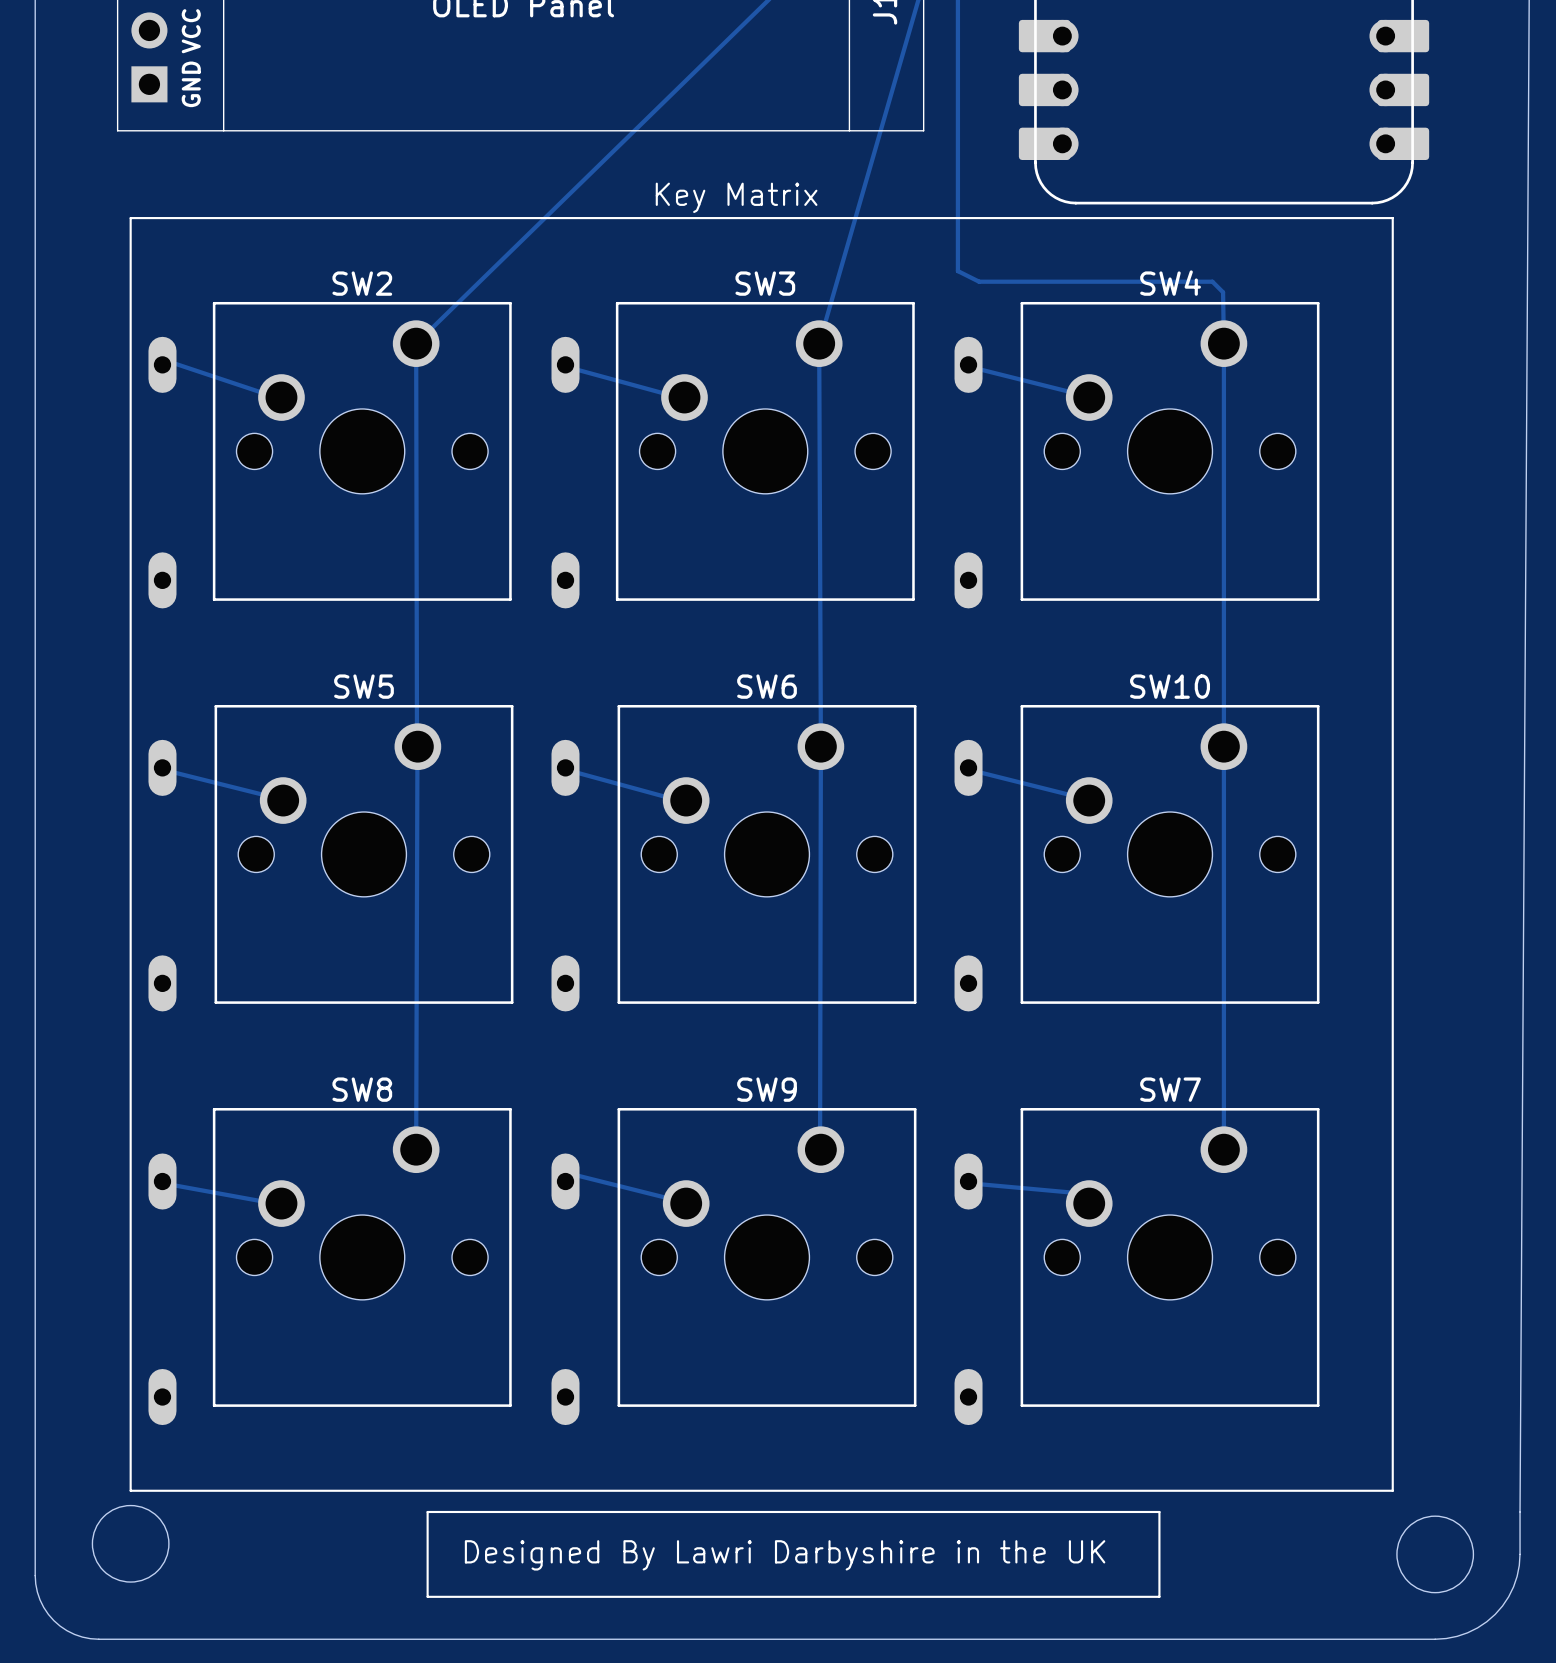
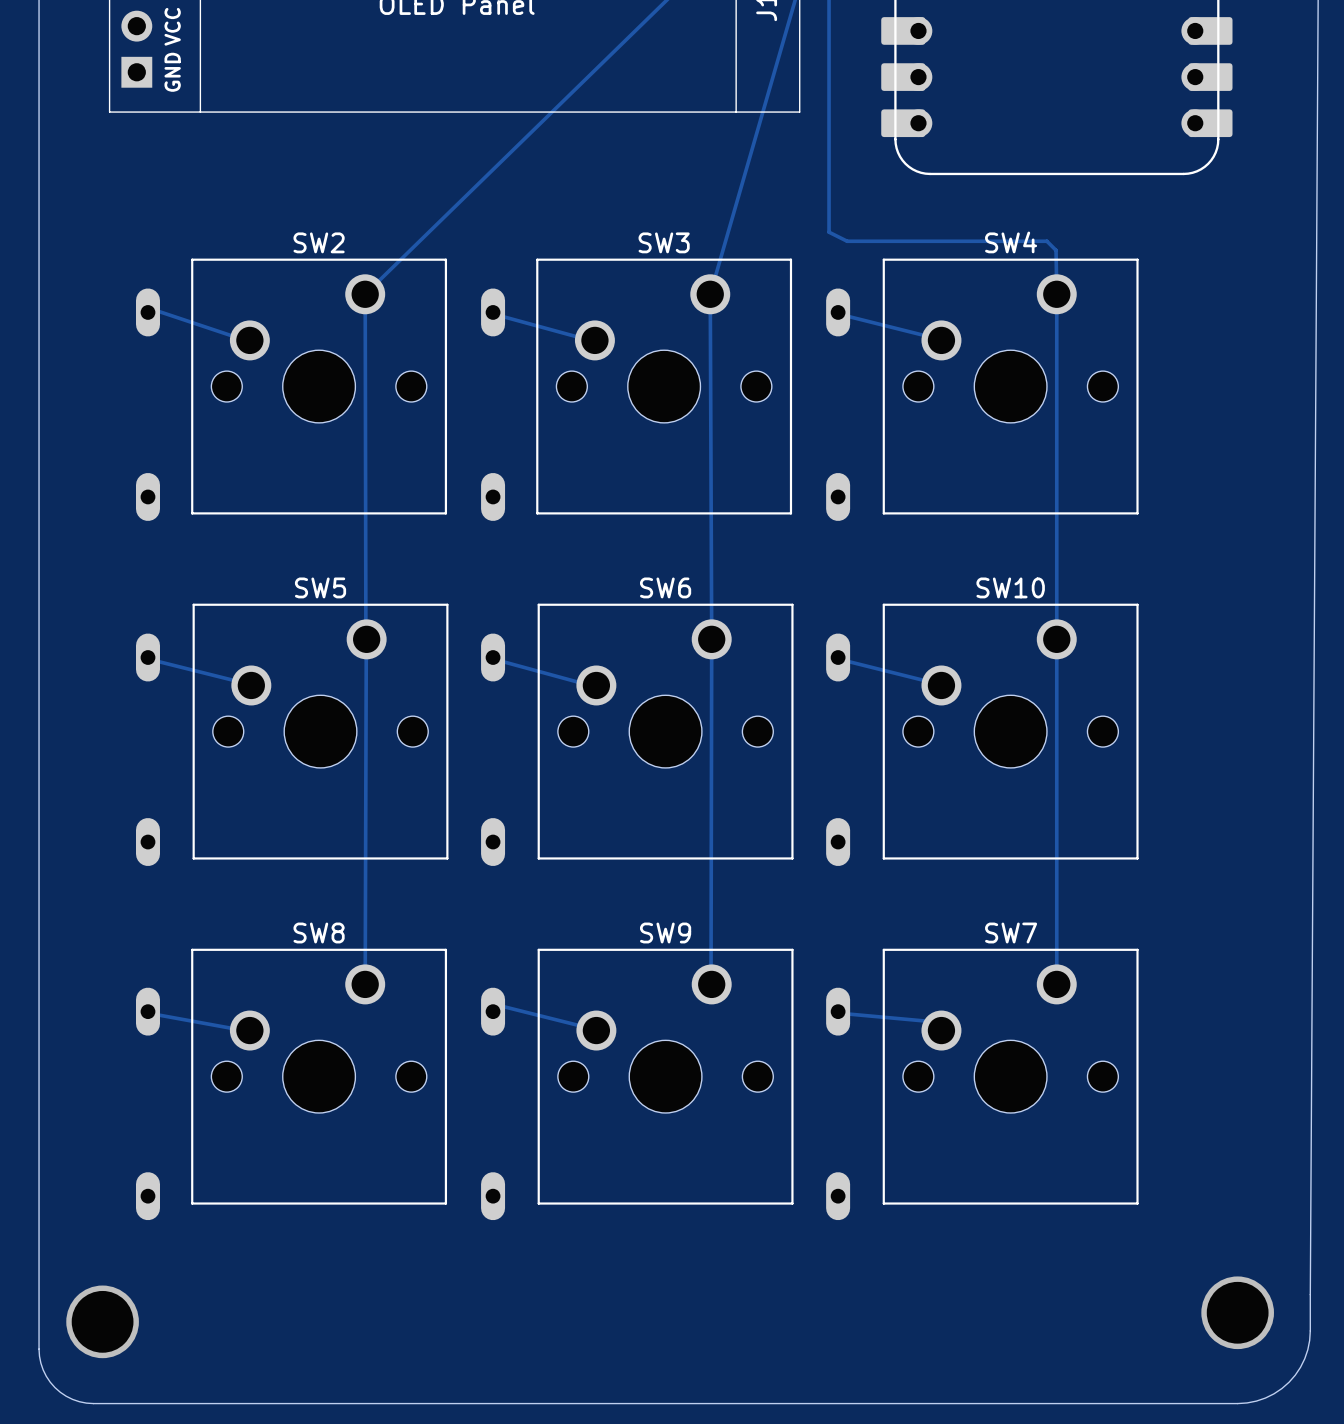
text: Key Matrix (736, 197) -> none
line: (130, 218) (1392, 218) (1392, 1490) (130, 1490) (130, 218) -> none
round board edge: [91, 1505, 170, 1583] -> none
line: (427, 1511) (1159, 1511) (1159, 1596) (427, 1596) (427, 1511) -> none
round board edge: [1396, 1515, 1474, 1594] -> none
via: none -> (1237, 1312)
via: none -> (102, 1321)
text: Designed By Lawri Darbyshire in the UK (785, 1555) -> none

